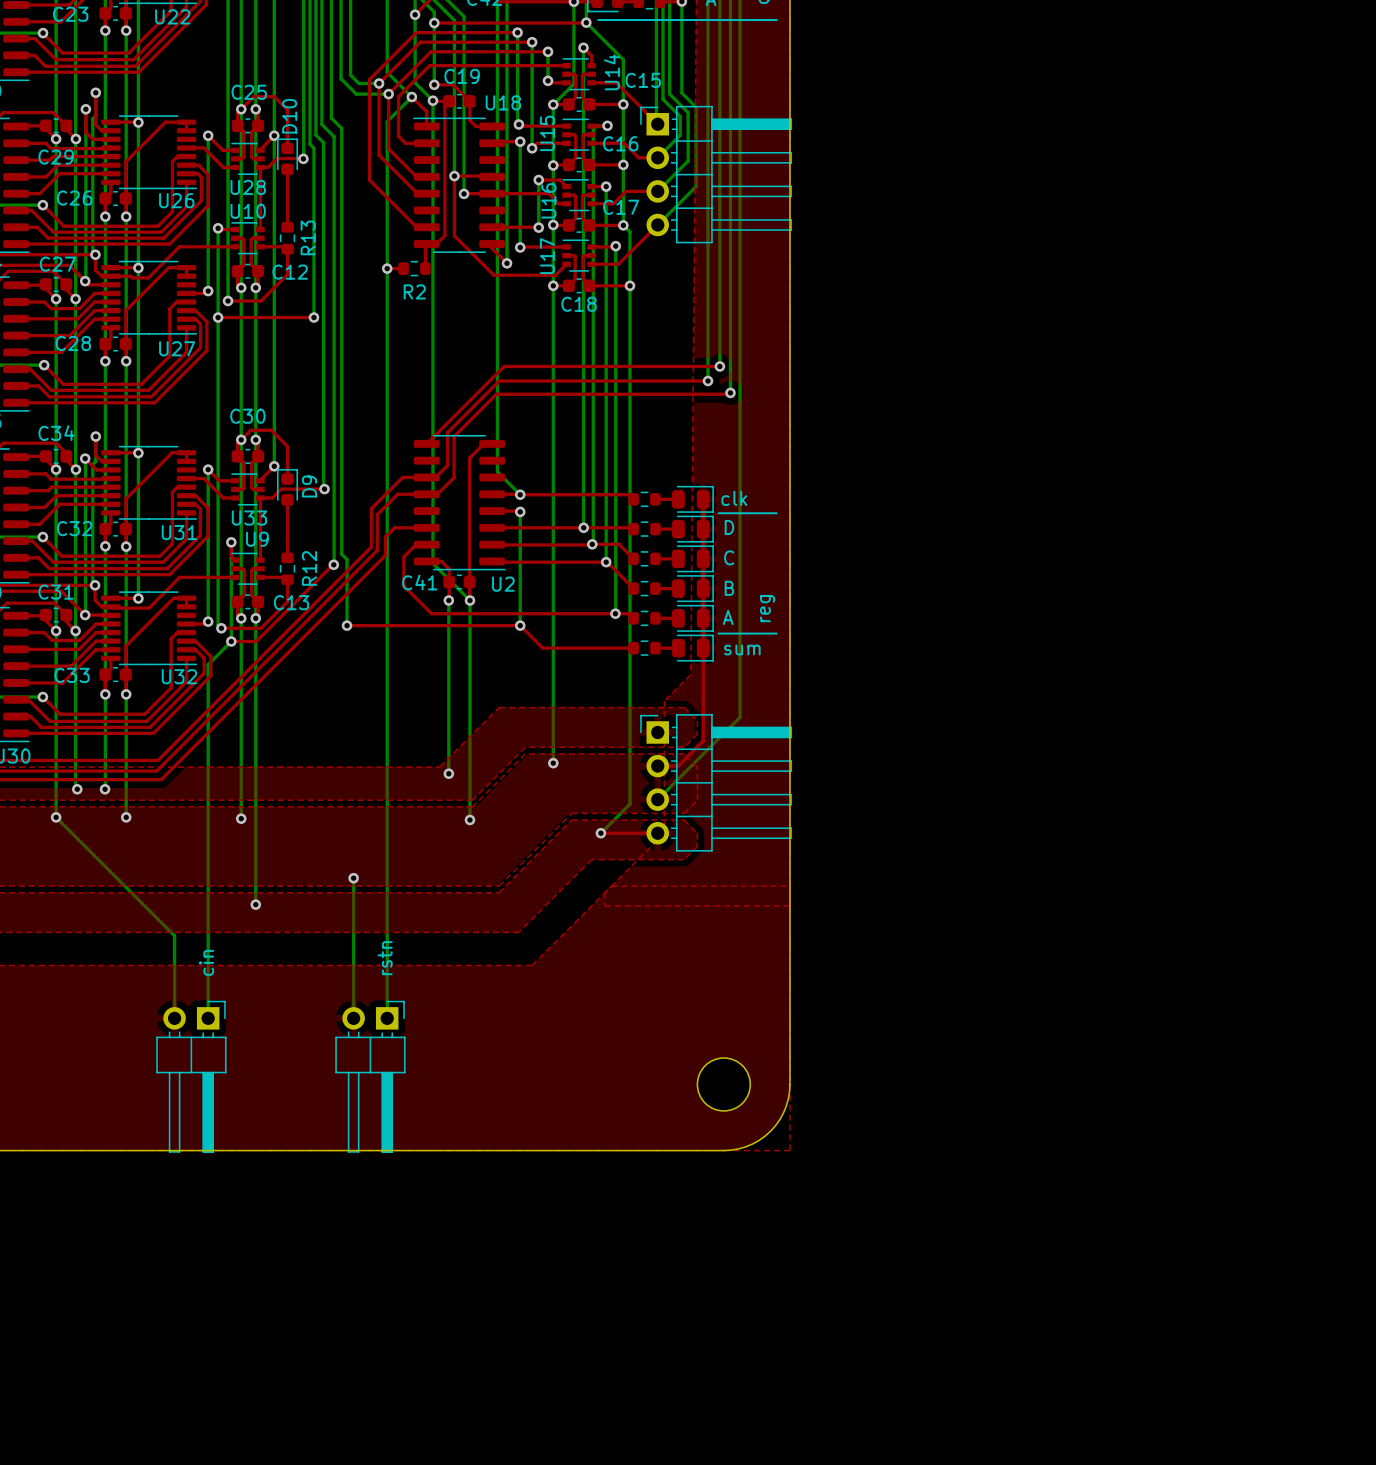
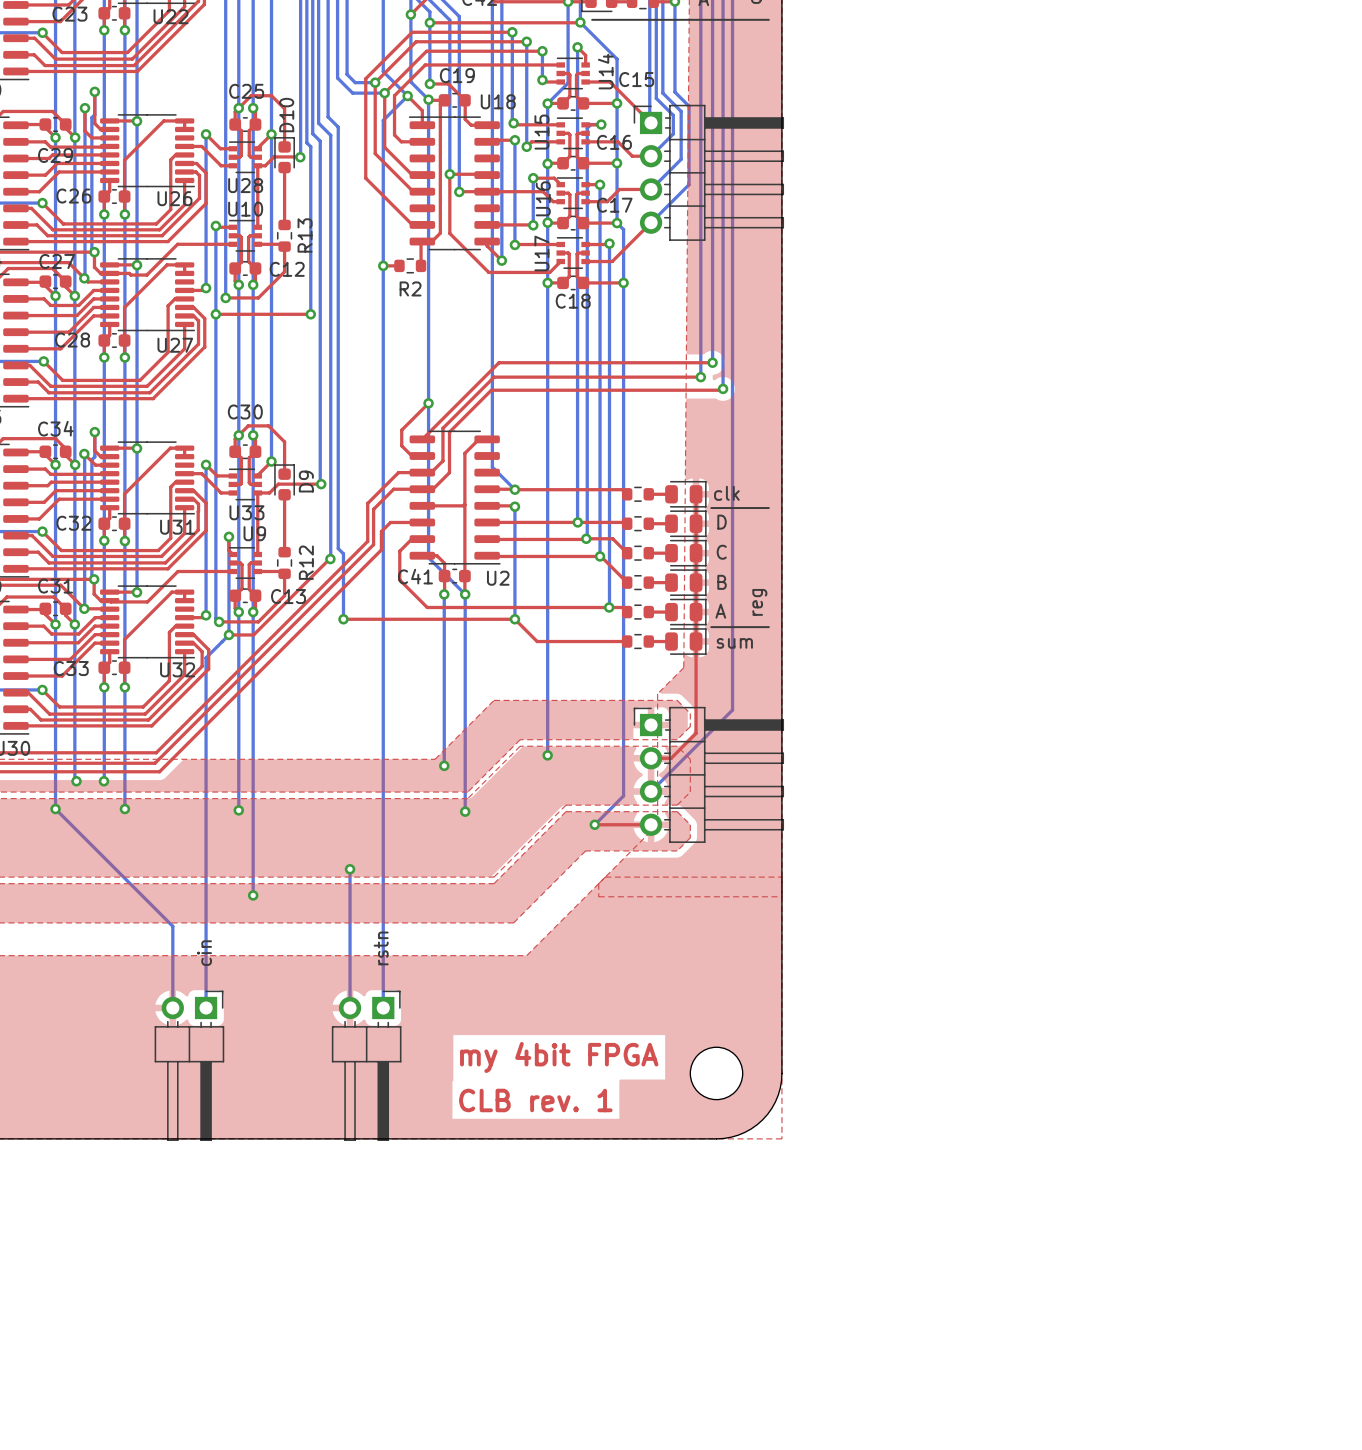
top track: none -> (428, 403) (401, 430) (401, 445) (411, 456) (422, 456)
via: none -> (428, 403)
top track: none -> (464, 504) (422, 505)
text: none -> my 4bit FPGA (559, 1057)
text: none -> CLB rev. 1 (535, 1100)

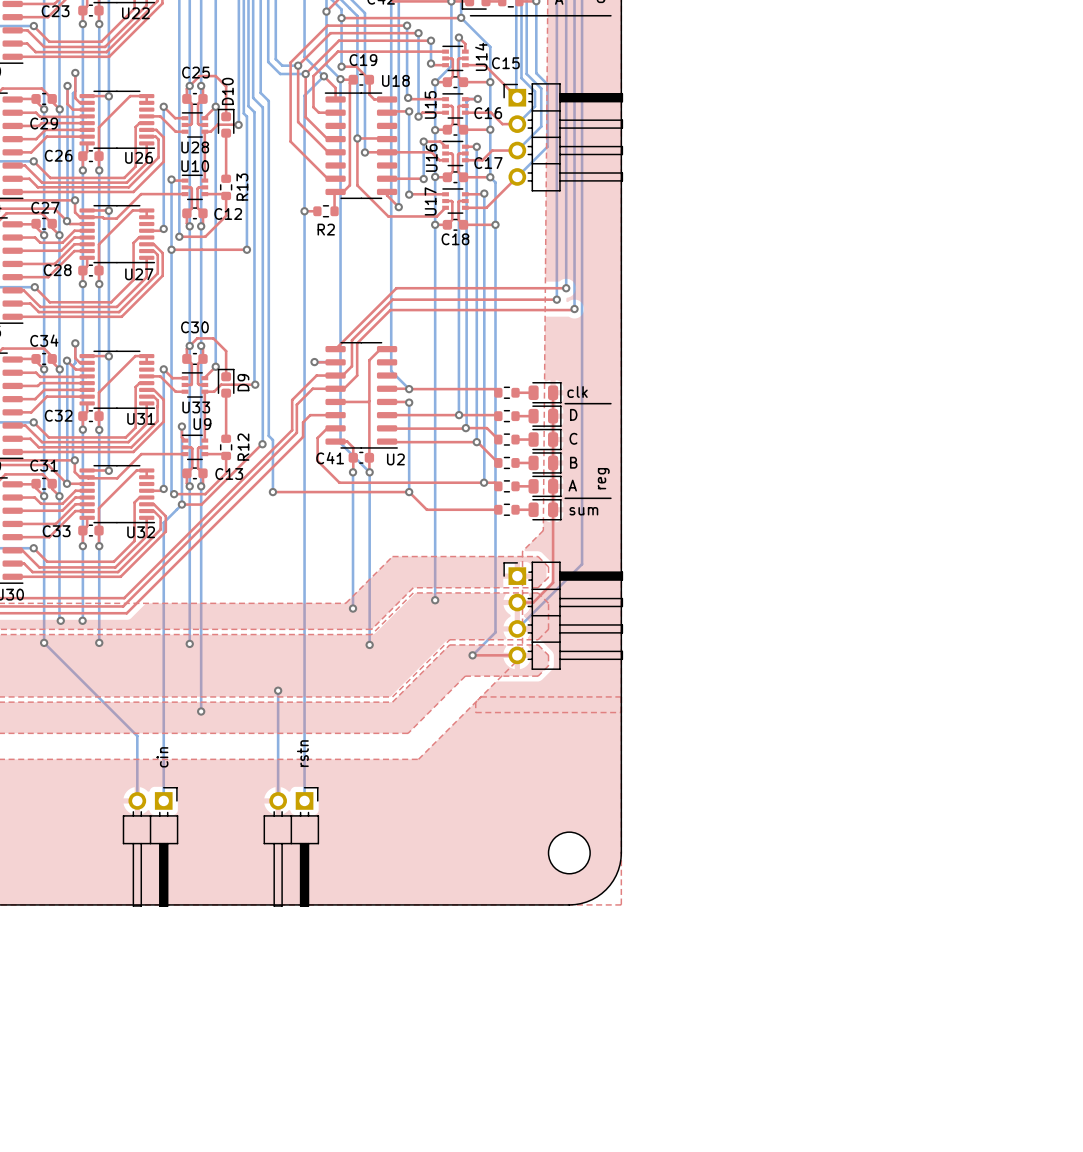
top track: (428, 403) (401, 430) (401, 445) (411, 456) -> (314, 362) (327, 362)
via position: (428, 403) -> (314, 362)
text: my 4bit FPGA (559, 1057) -> none
text: CLB rev. 1 (535, 1100) -> none

